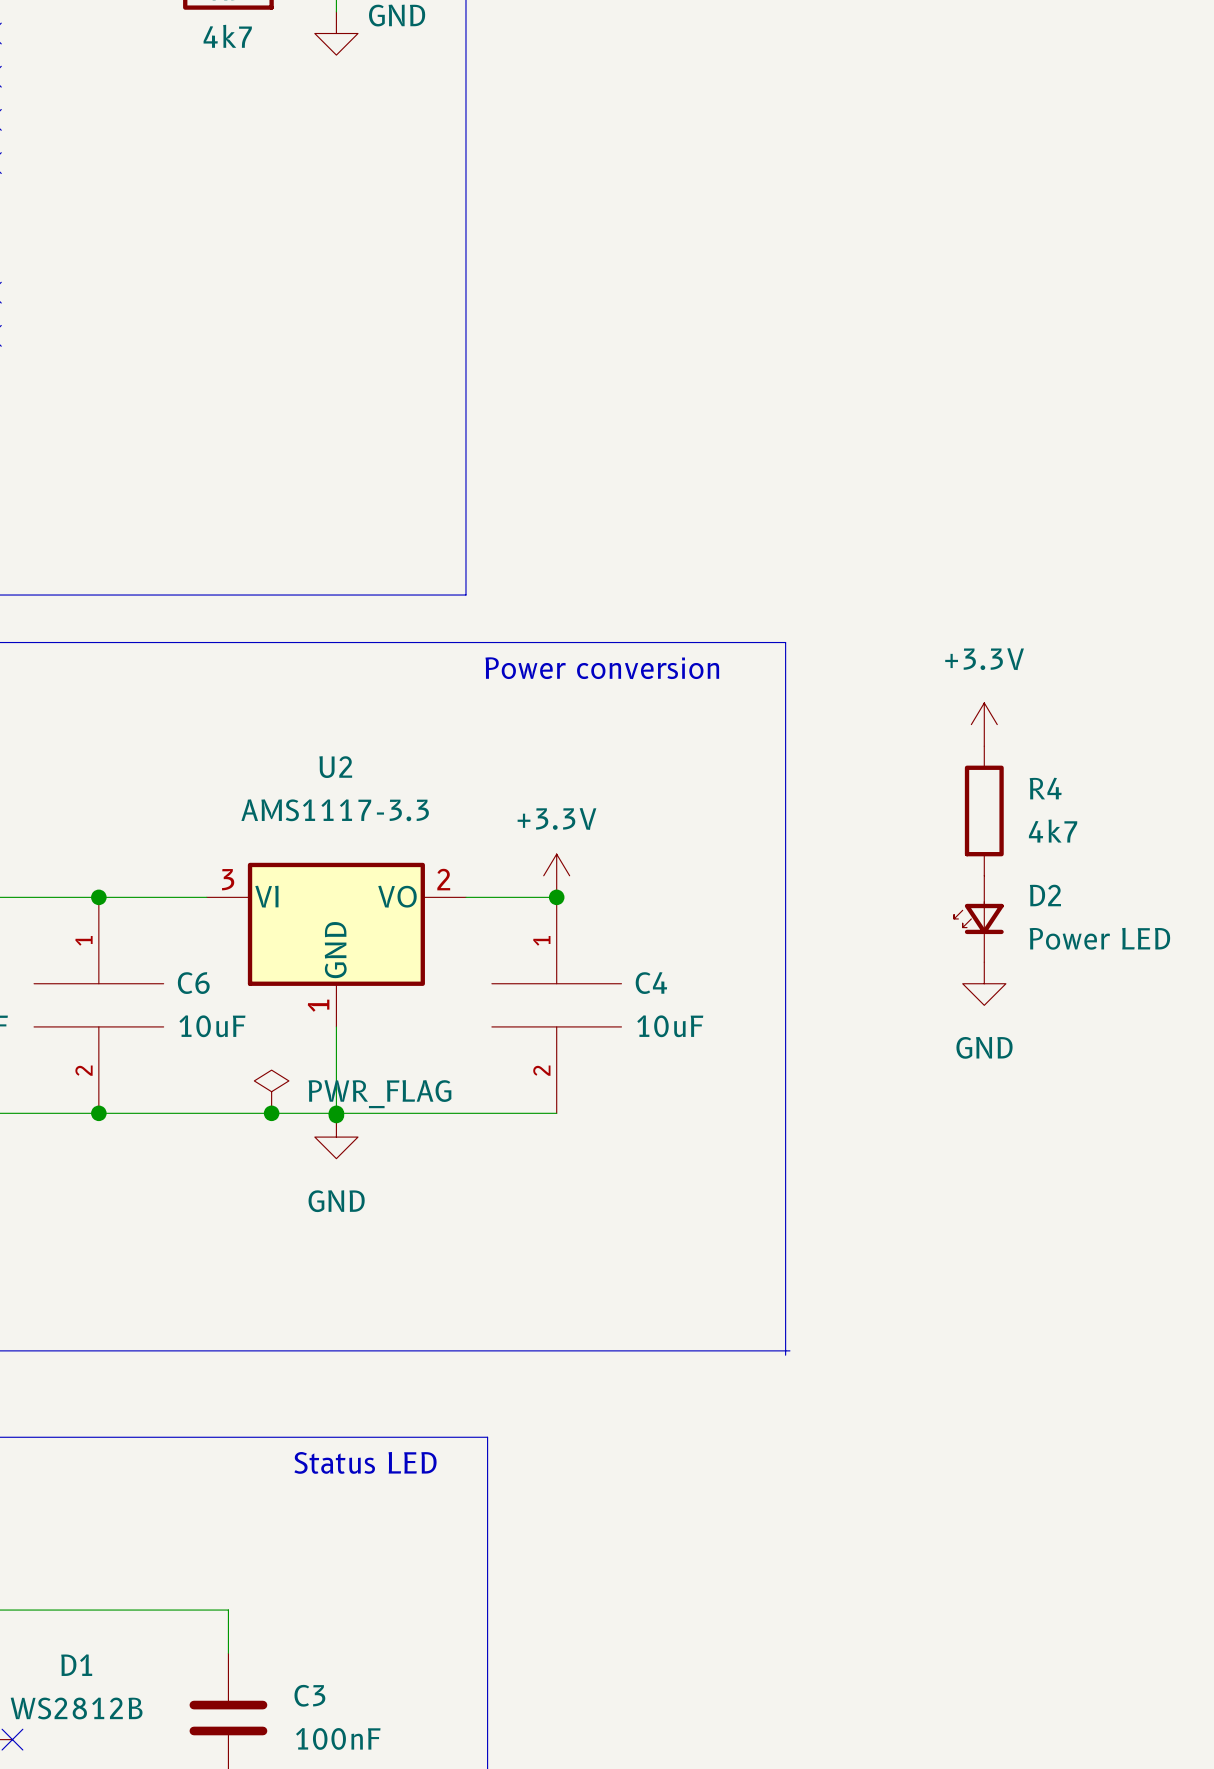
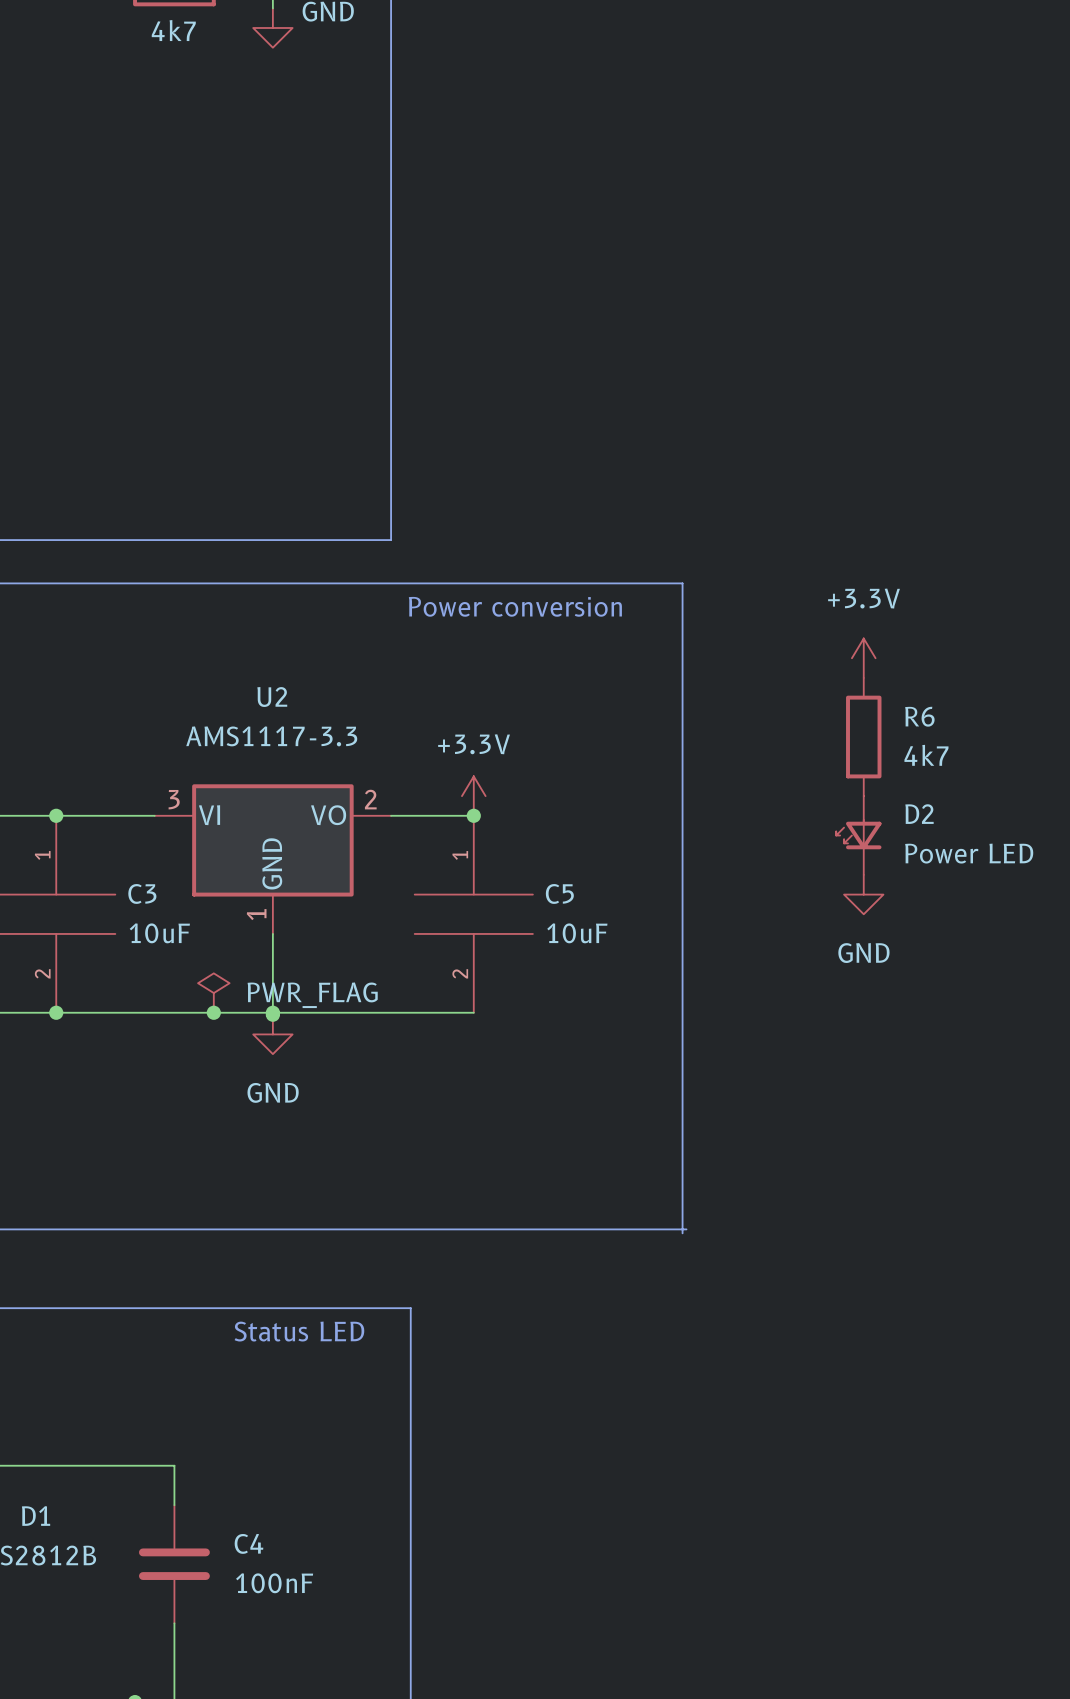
R4 name: R4 (1045, 788) -> R6 (919, 716)
C6 name: C6 (193, 983) -> C3 (142, 893)
C4 name: C4 (651, 983) -> C5 (559, 893)
C3 name: C3 (309, 1695) -> C4 (248, 1543)

